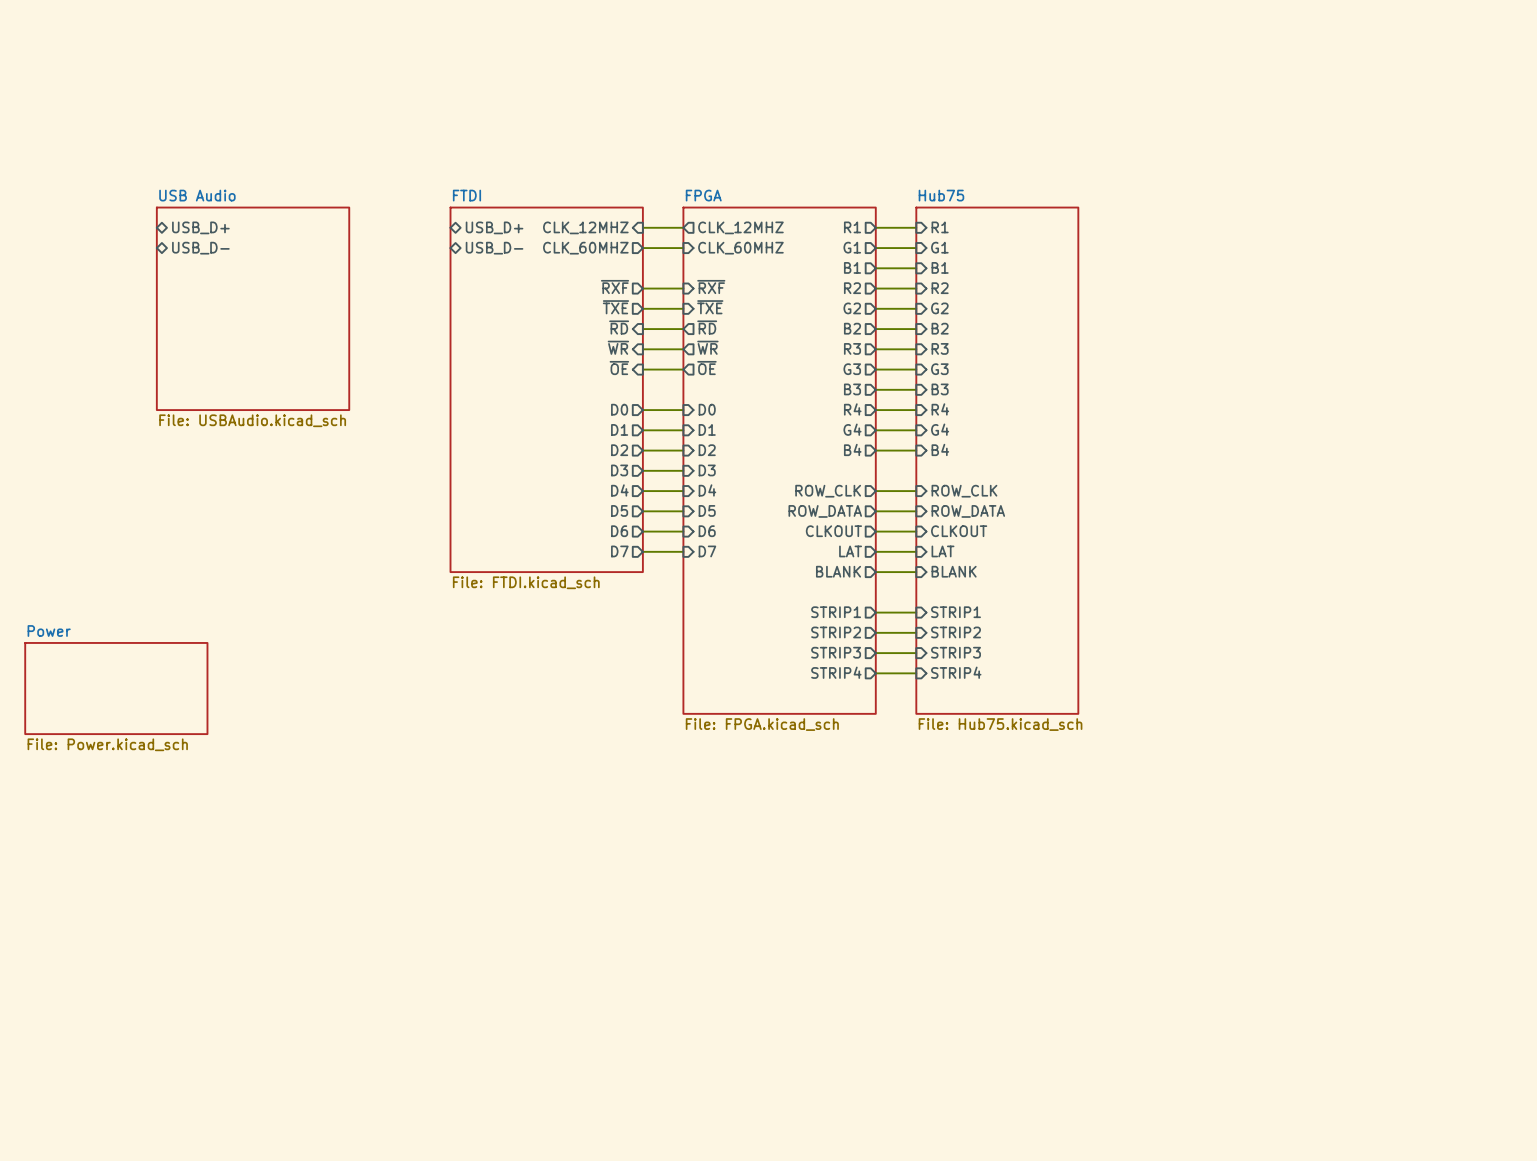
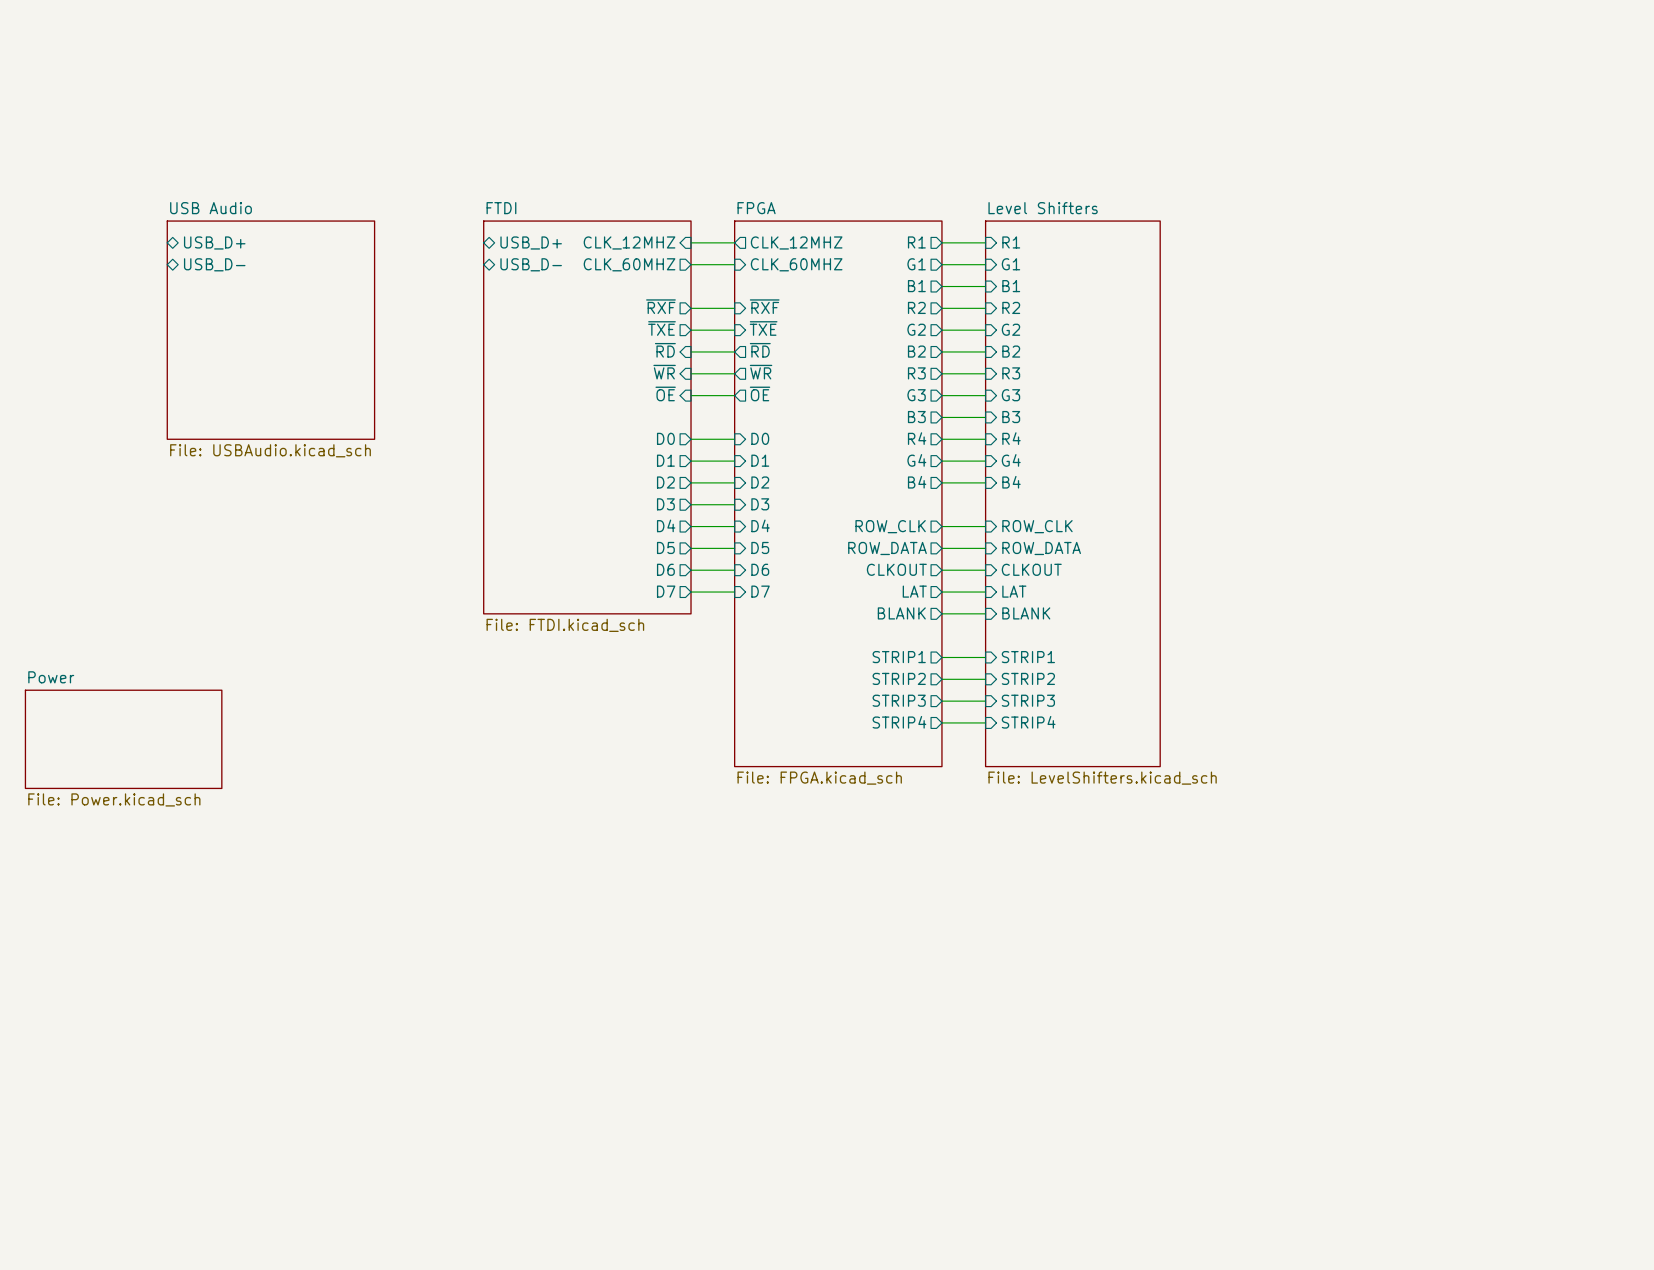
sheet Hub75 name: Hub75 (941, 195) -> Level Shifters (1043, 208)
sheet Hub75 value: File: Hub75.kicad_sch (1000, 724) -> File: LevelShifters.kicad_sch (1102, 778)

